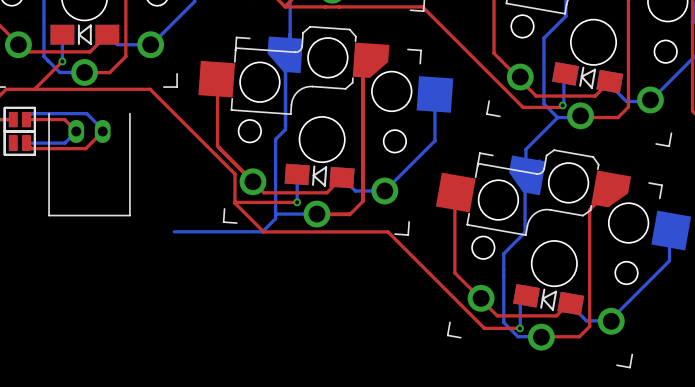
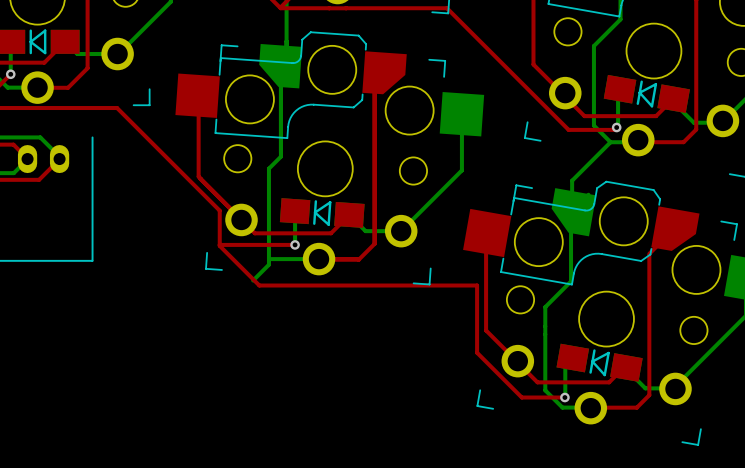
bottom track: (174, 231) (262, 231) -> none
top track: (263, 231) (387, 231) (447, 291) -> (254, 280) (259, 285) (477, 285) (477, 352)

